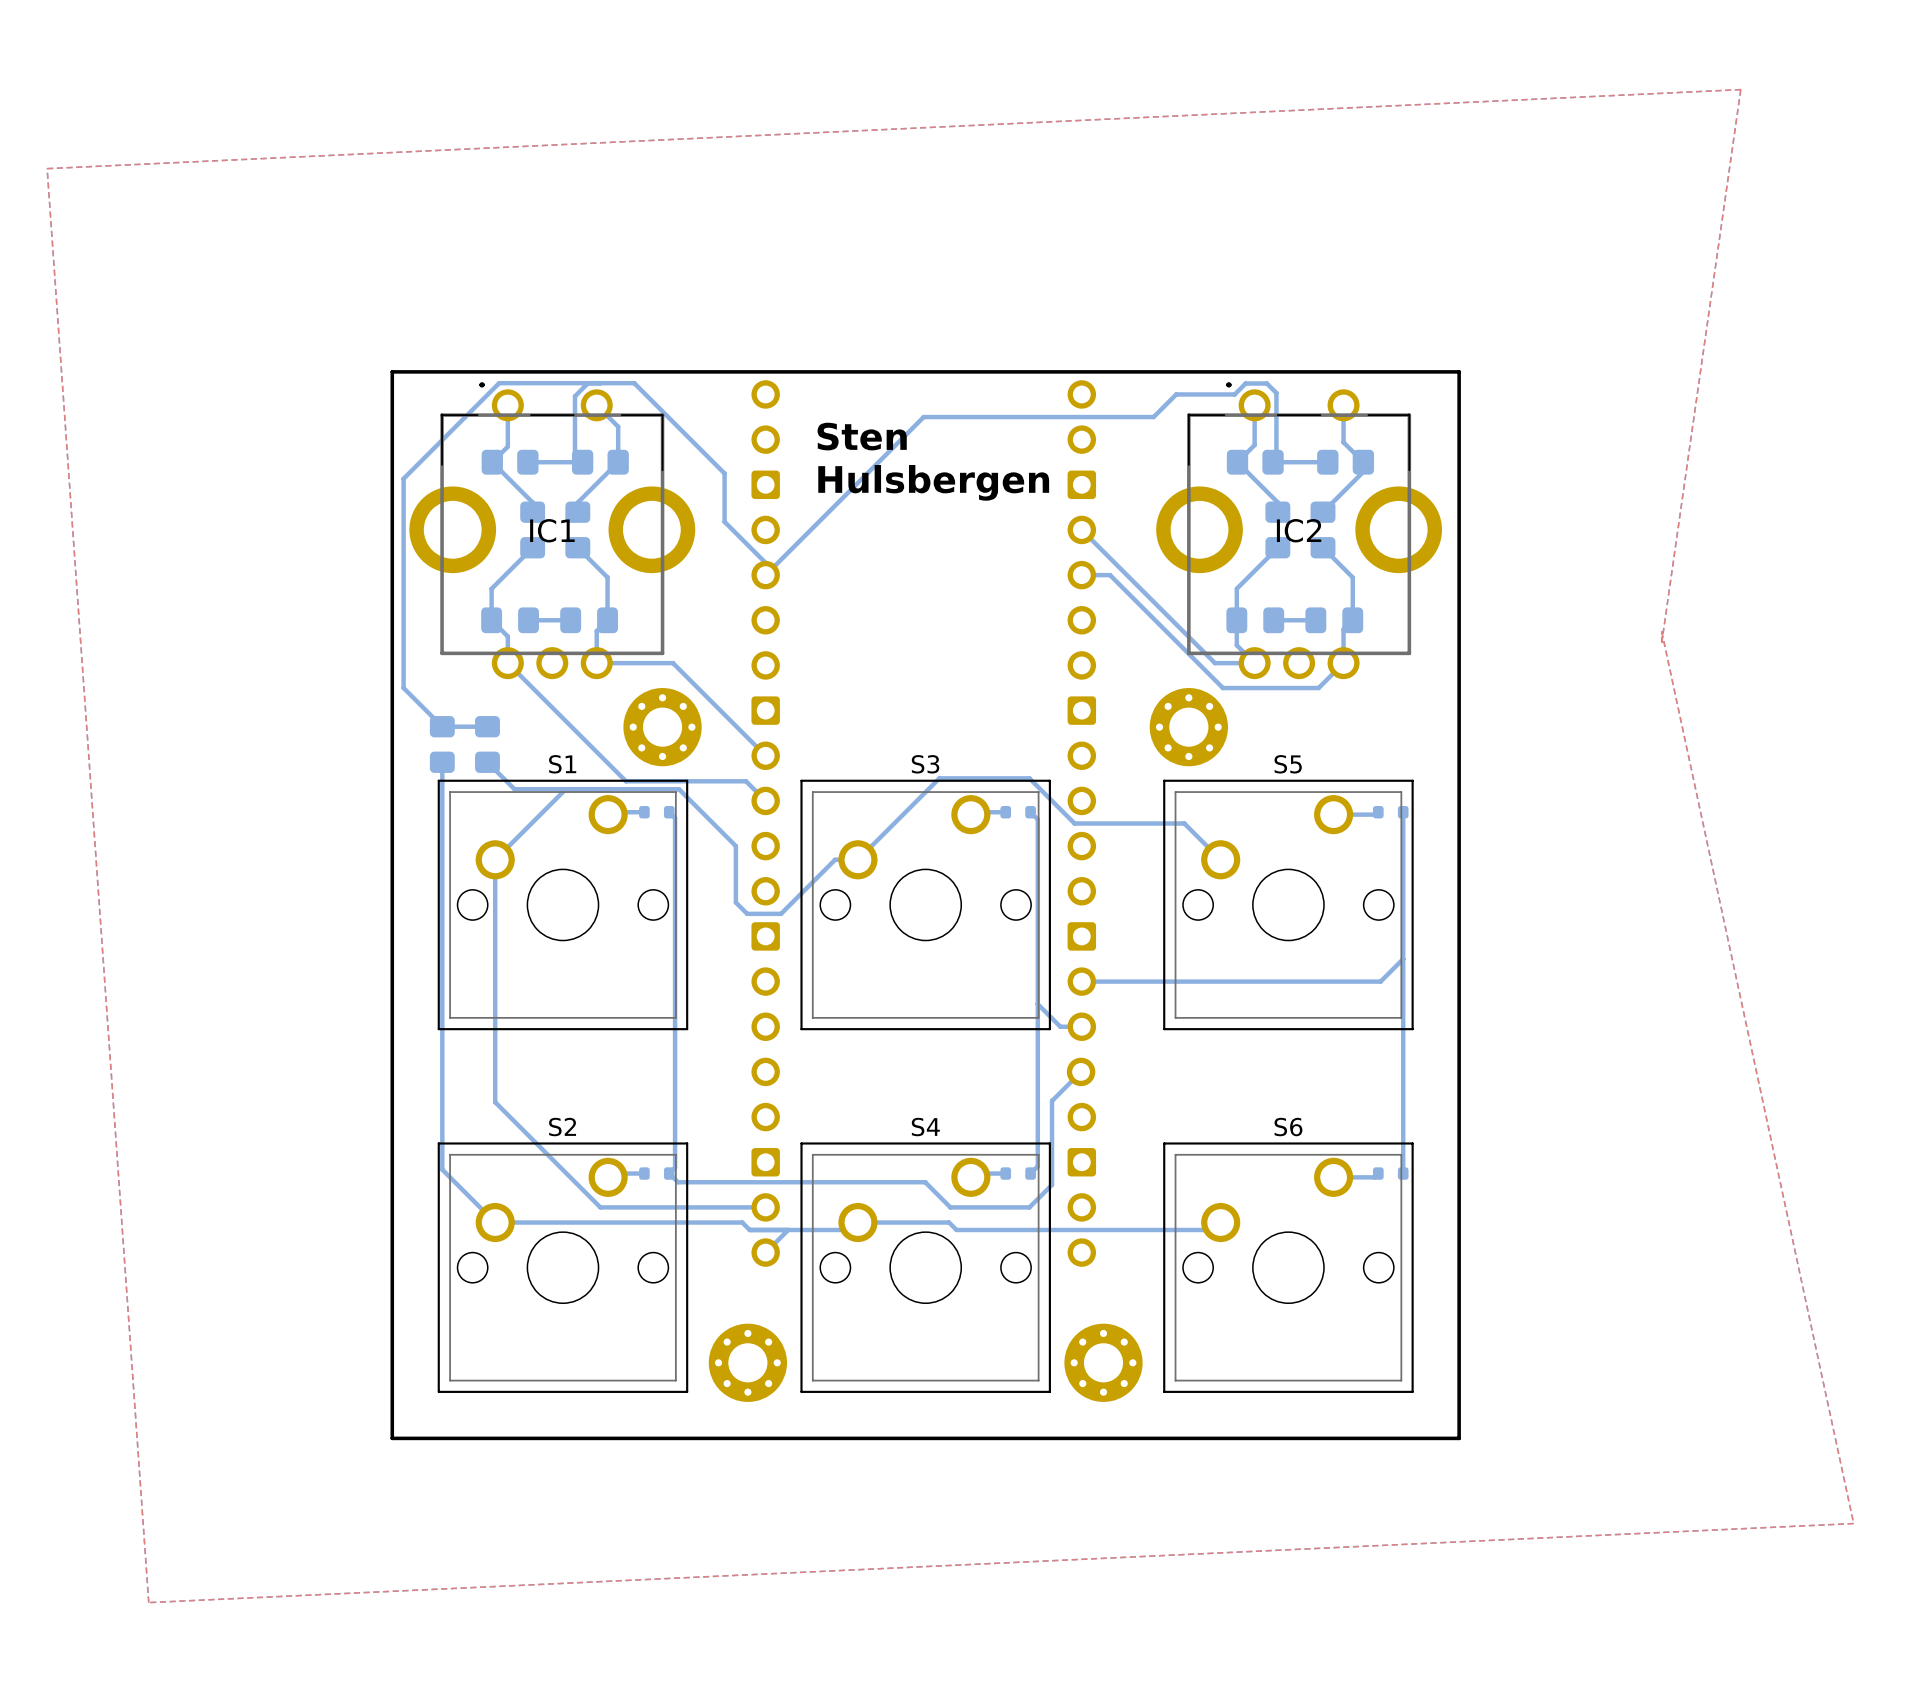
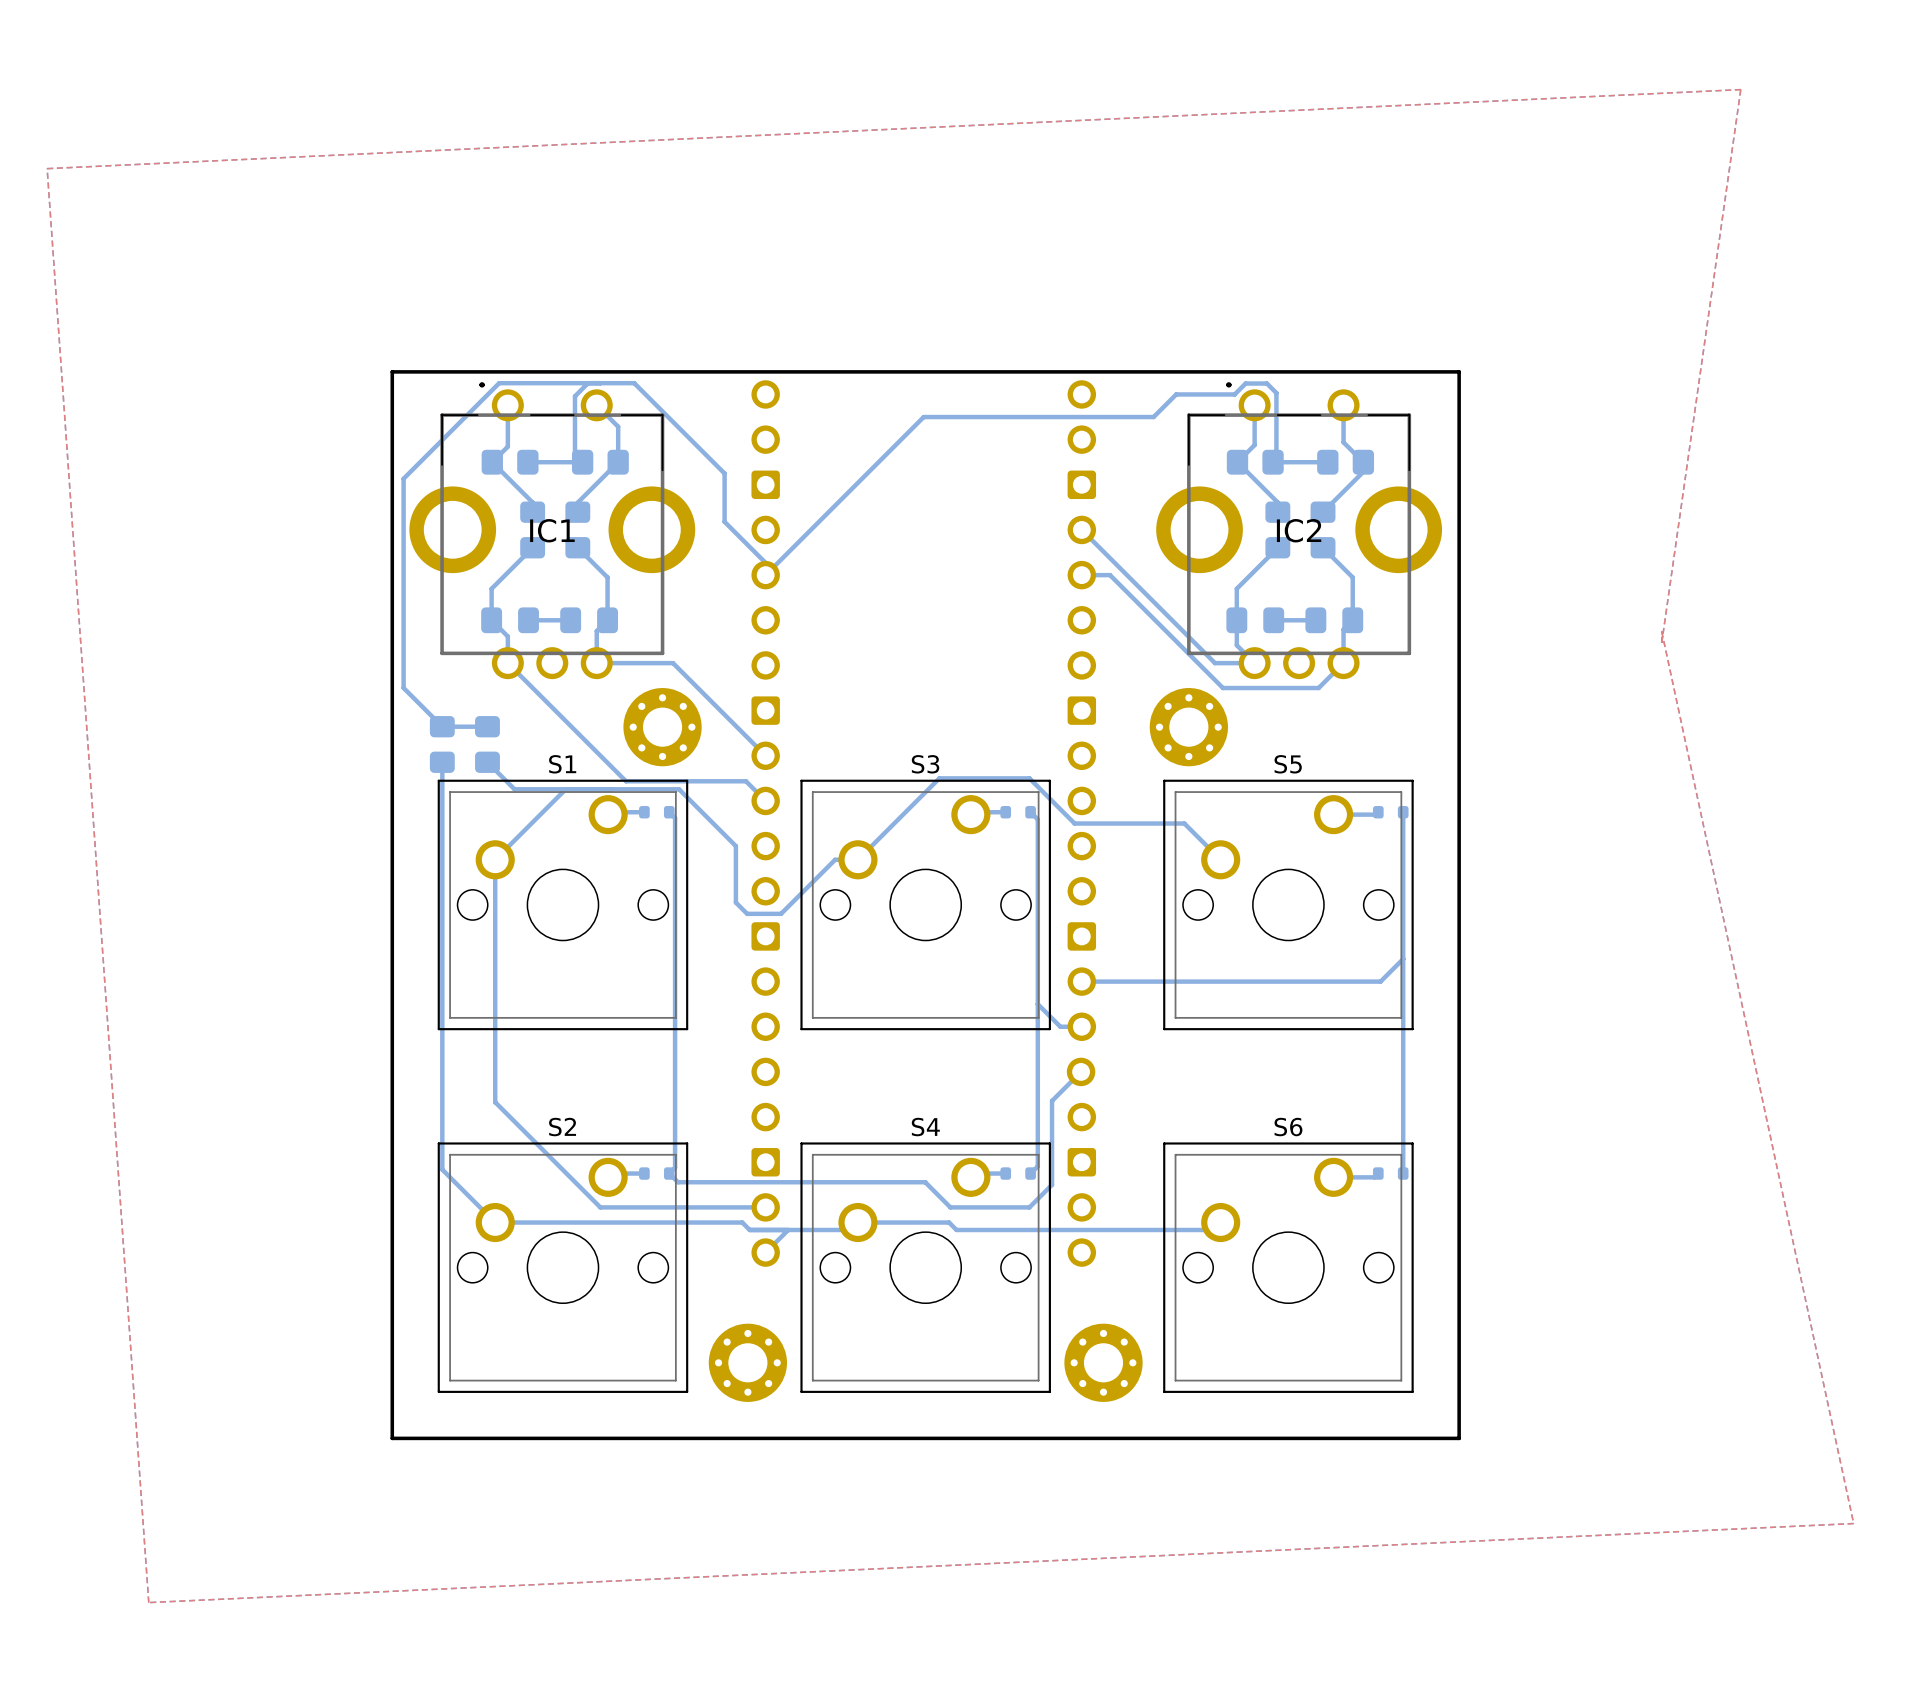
text: Sten (862, 436) -> none
text: Hulsbergen (933, 482) -> none

